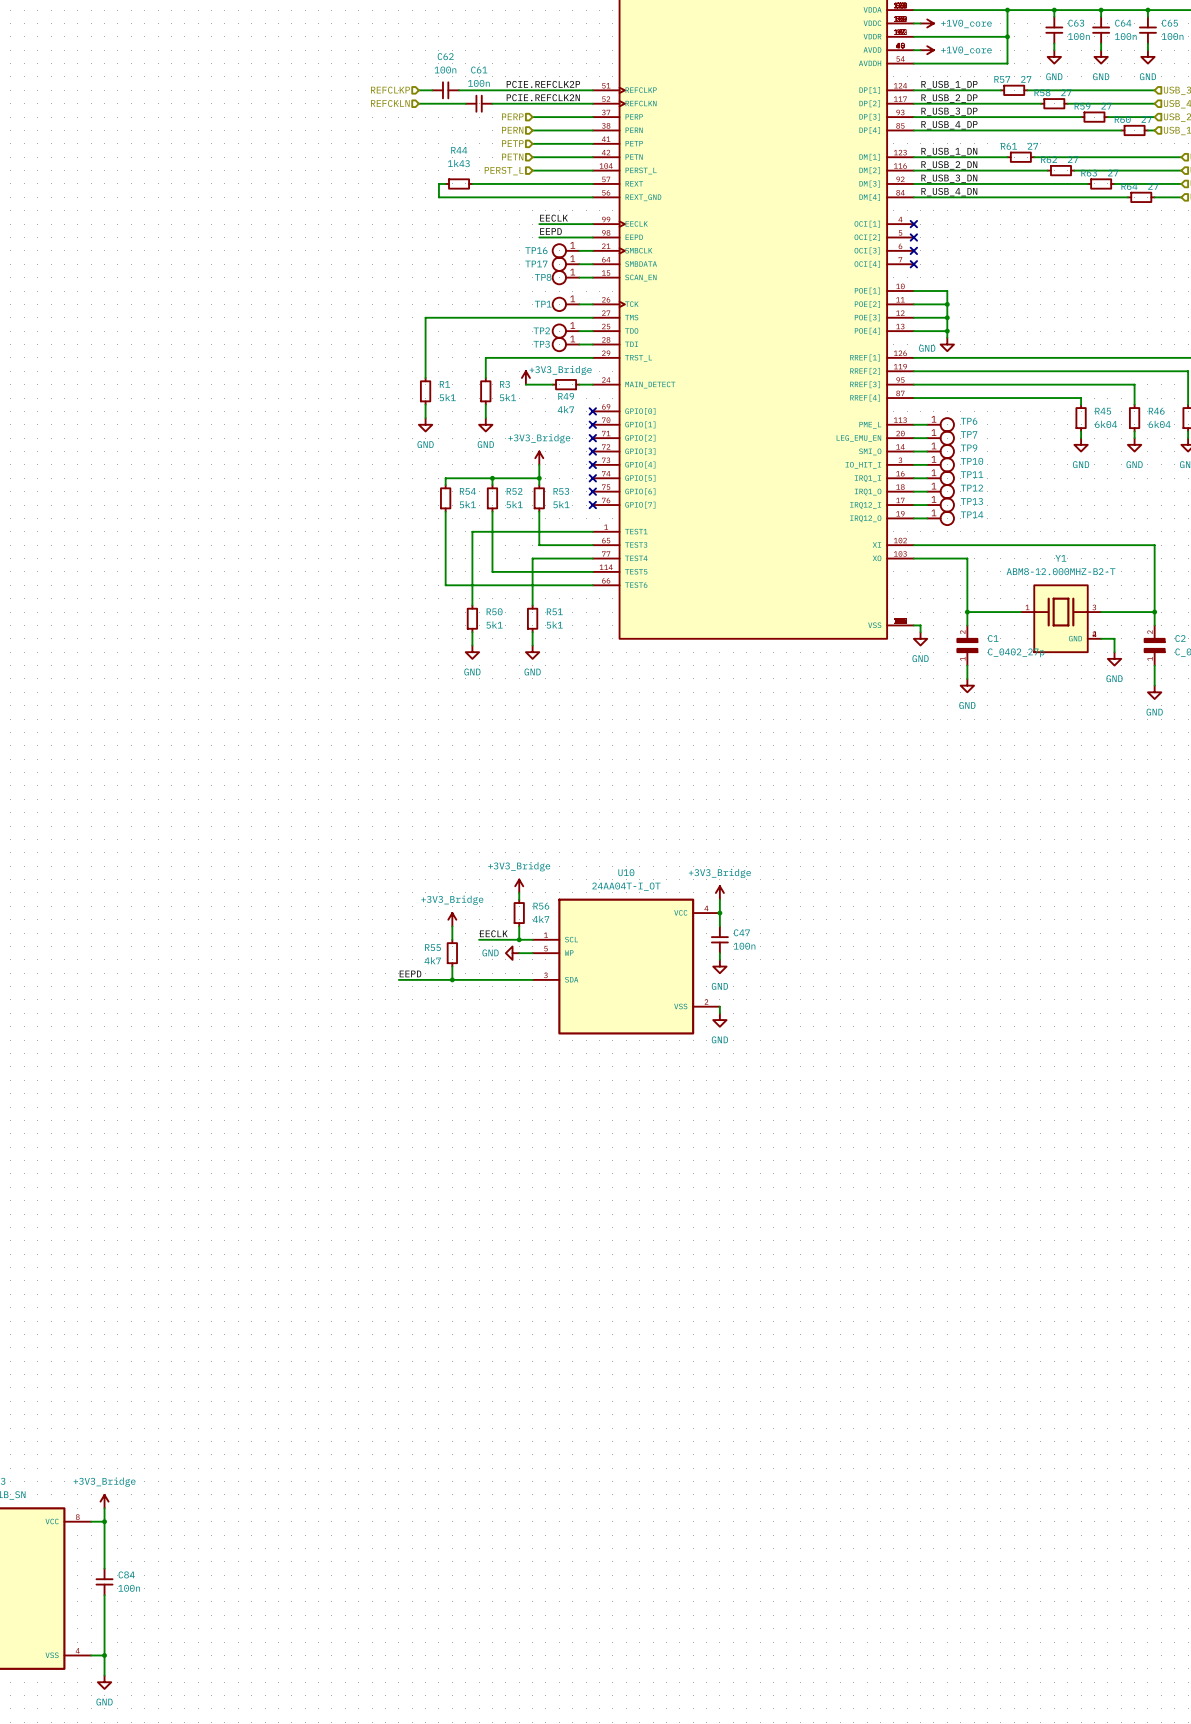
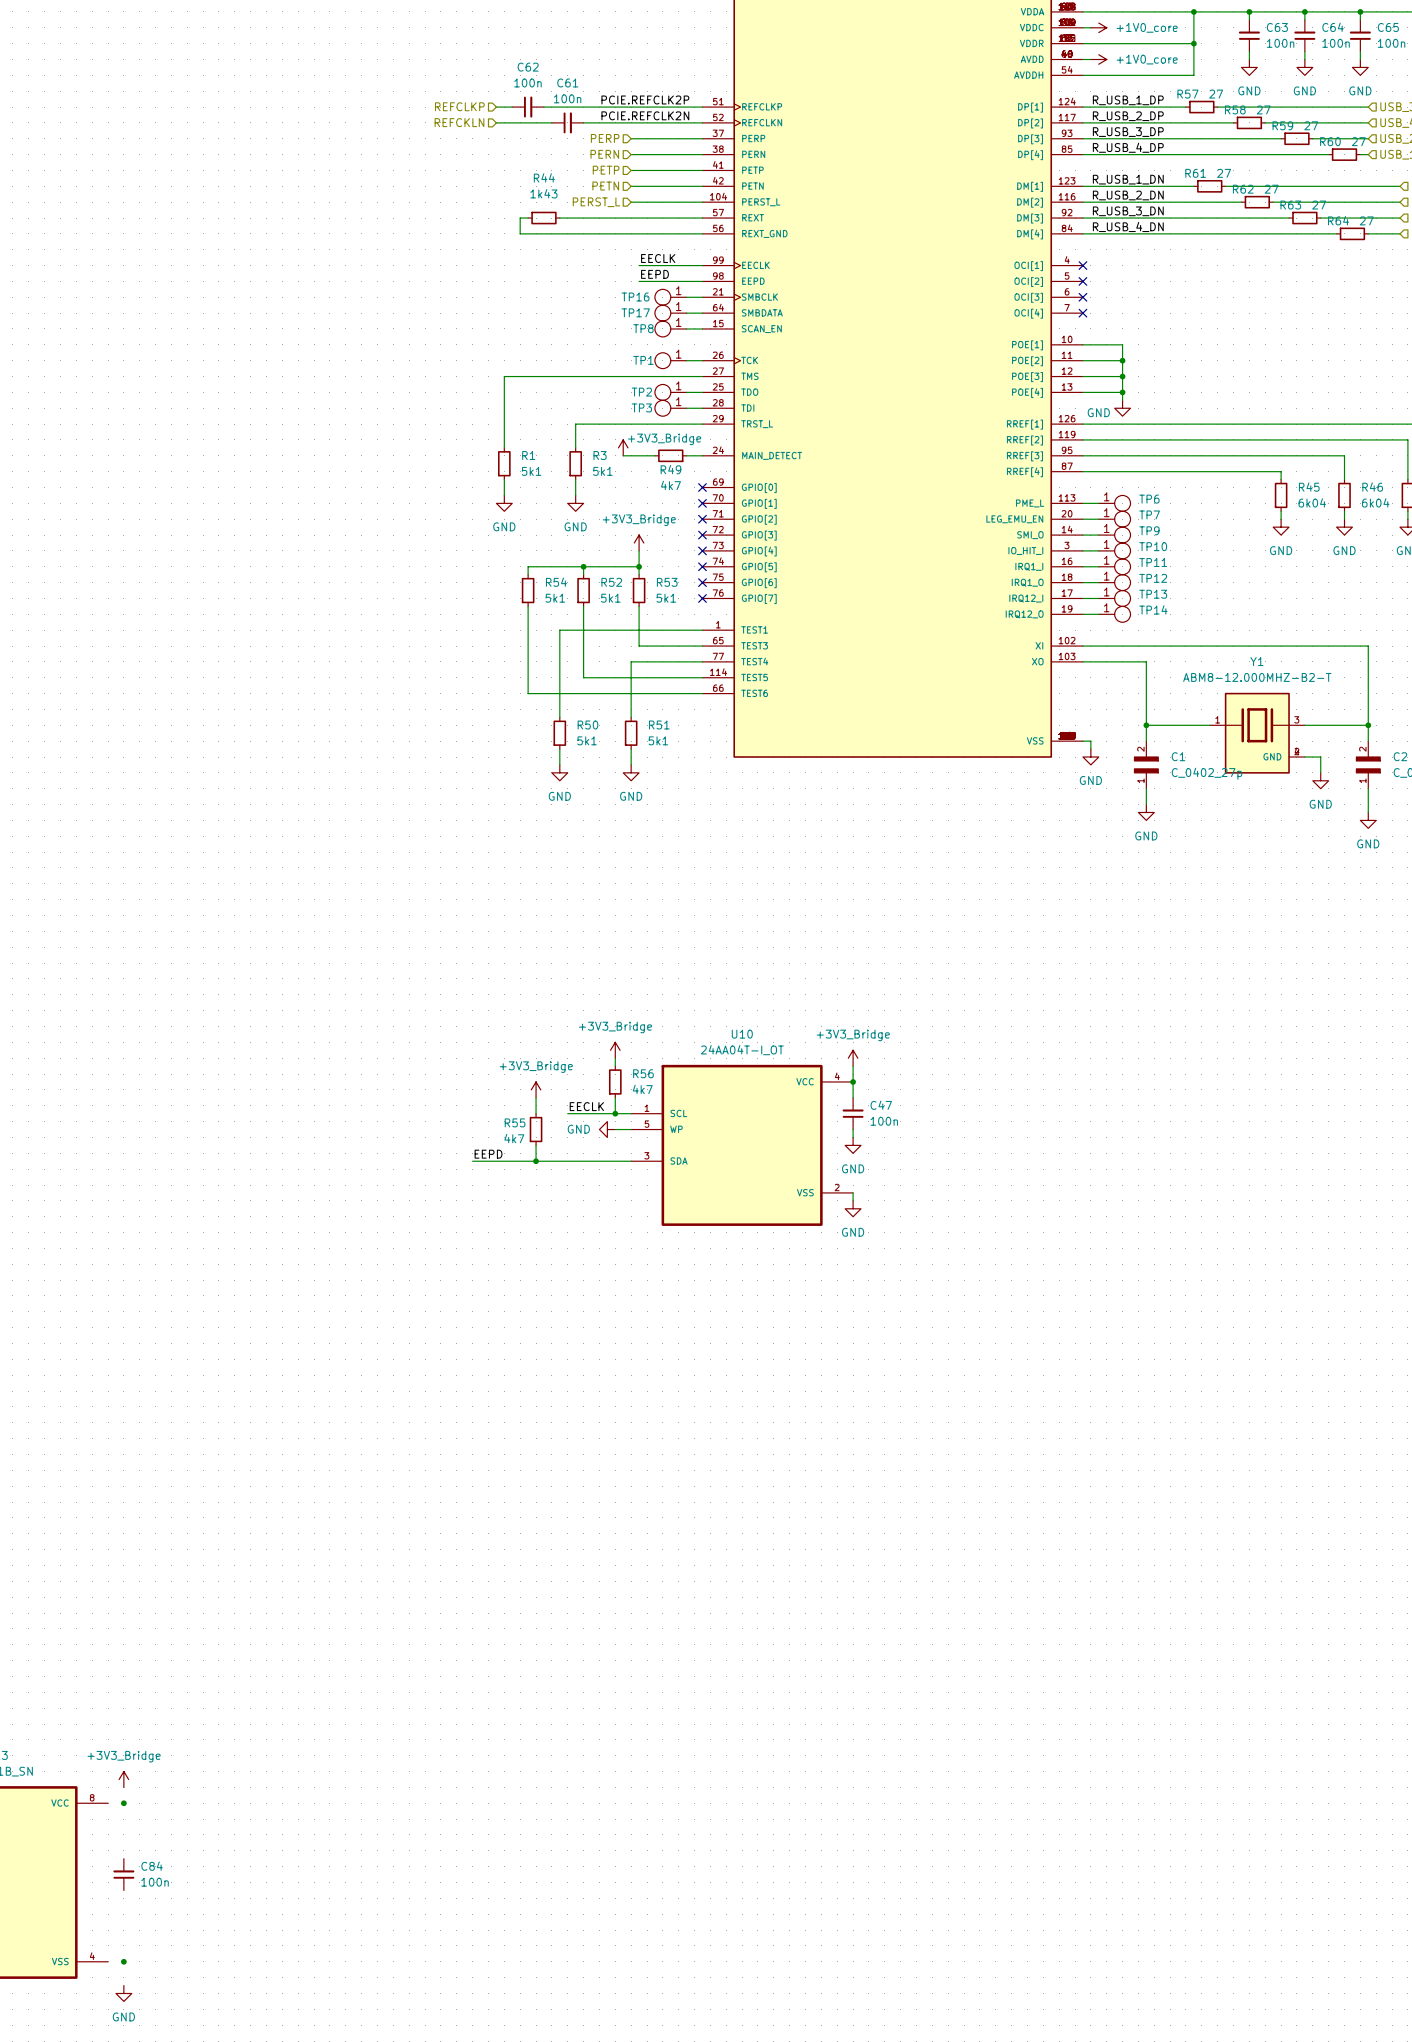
wire: (104, 1508) (104, 1568) -> none
wire: (91, 1521) (104, 1521) -> none
wire: (104, 1595) (104, 1675) -> none
wire: (91, 1655) (104, 1655) -> none

